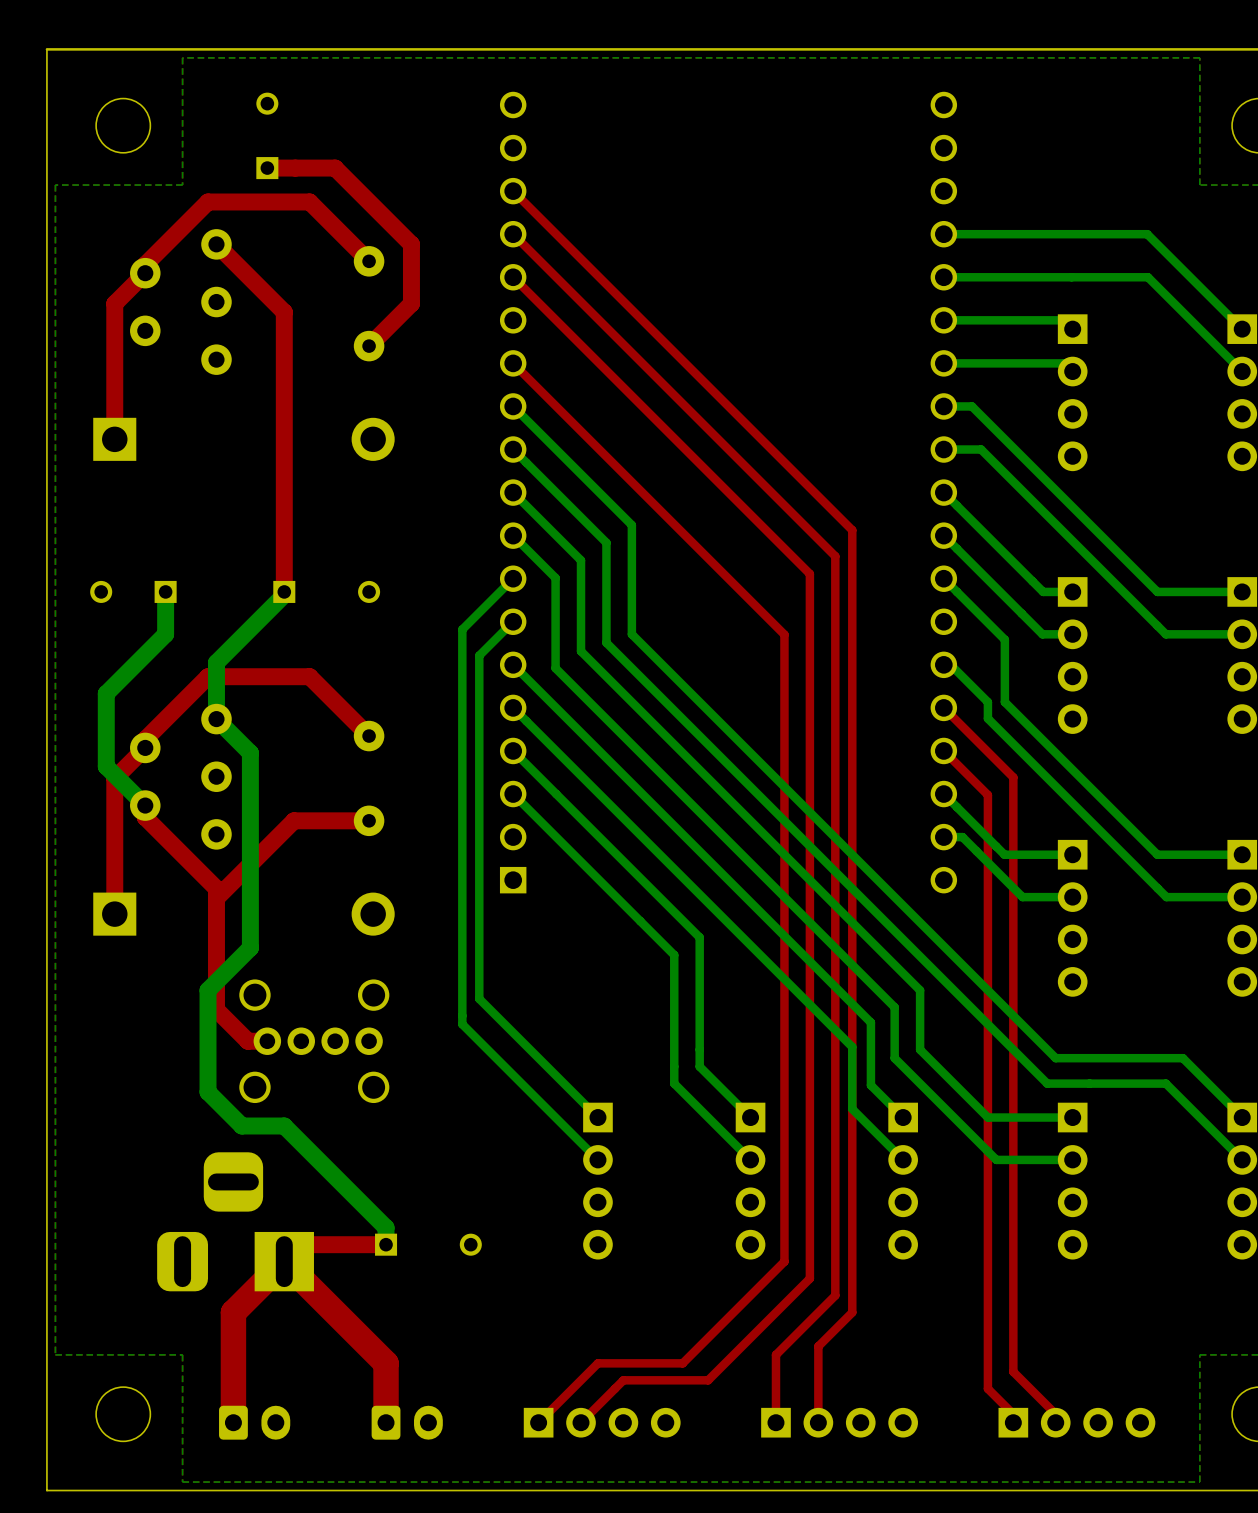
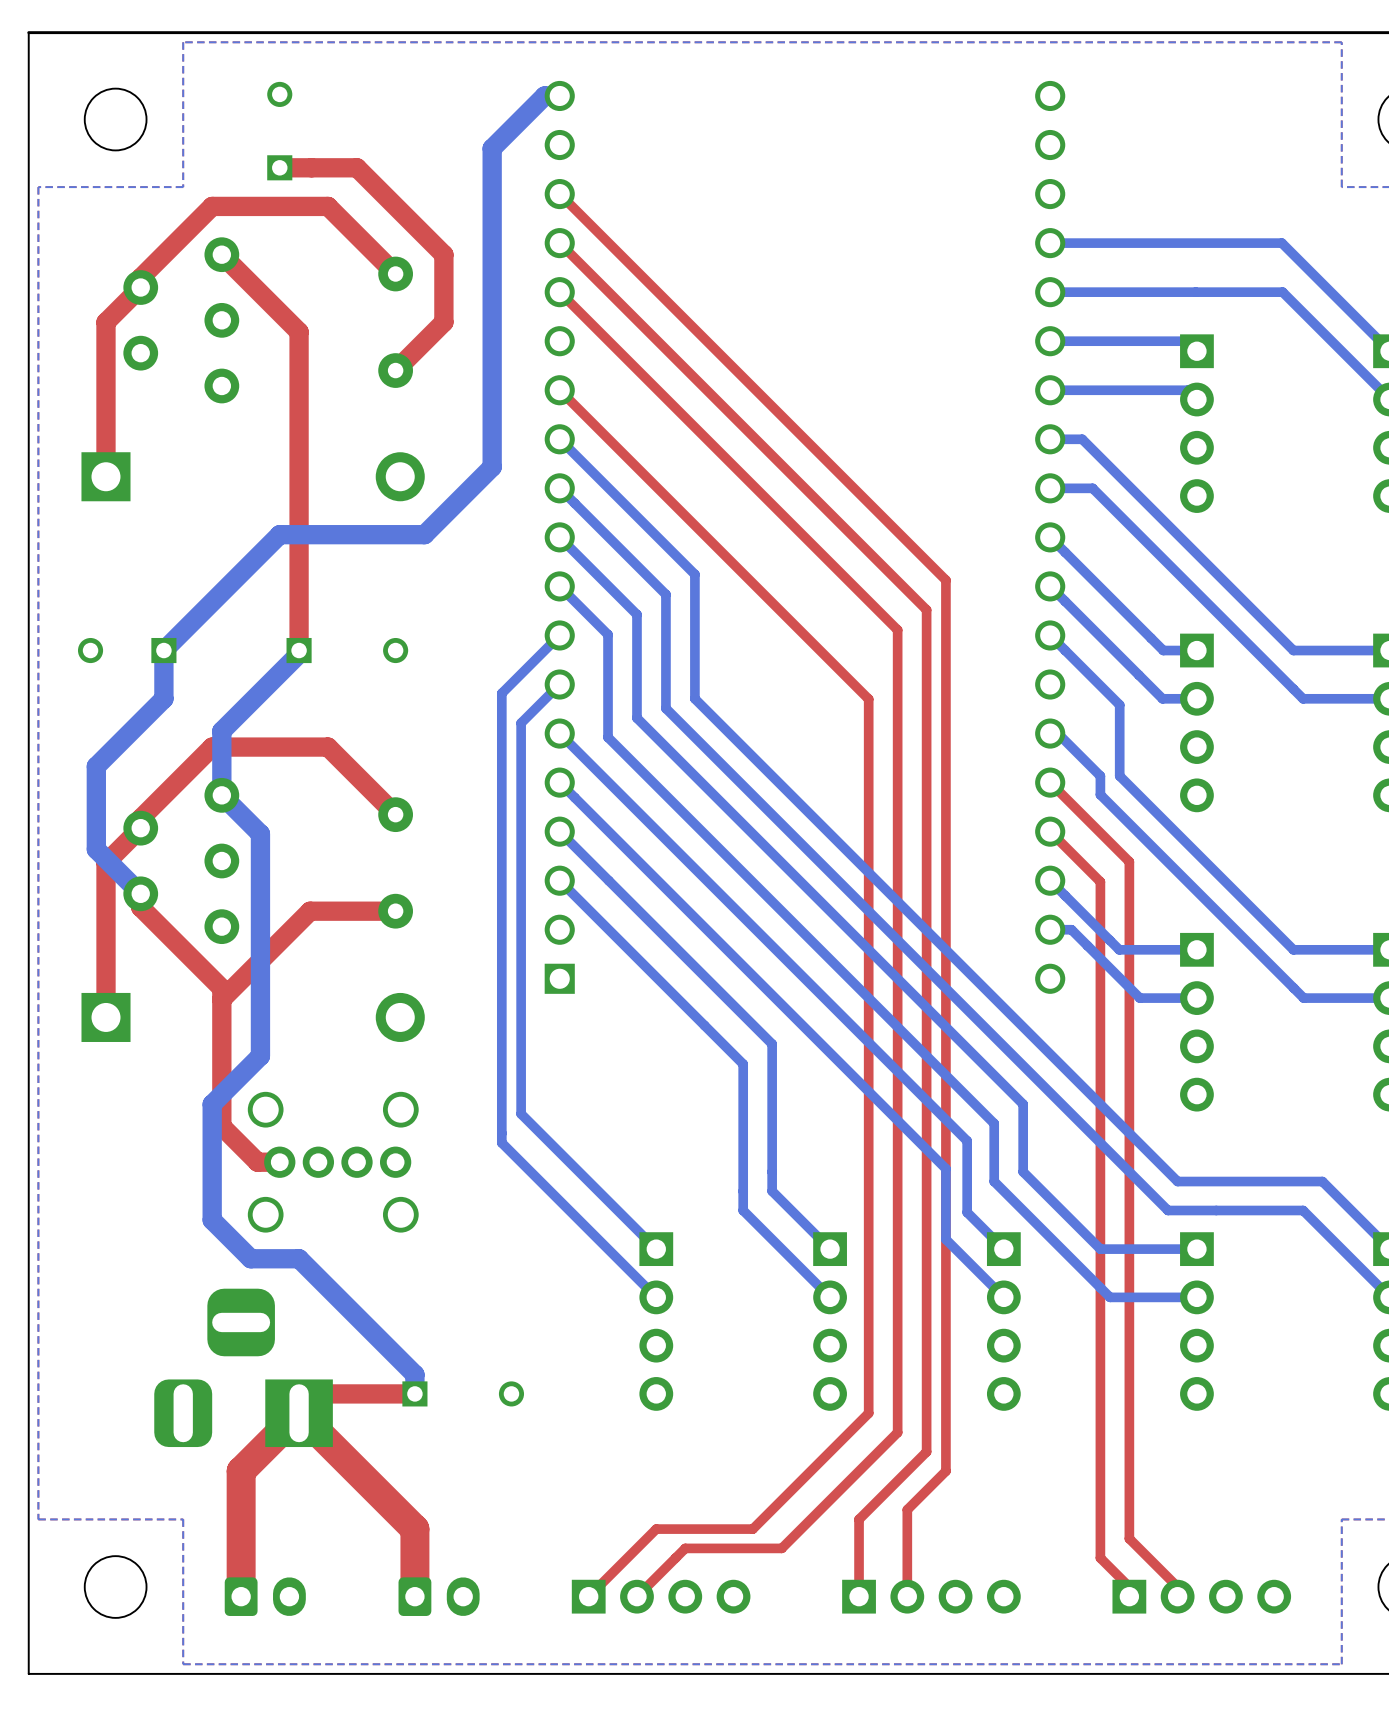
bottom track: none -> (559, 95) (544, 95) (492, 148) (492, 467) (424, 534) (279, 534) (163, 650)

